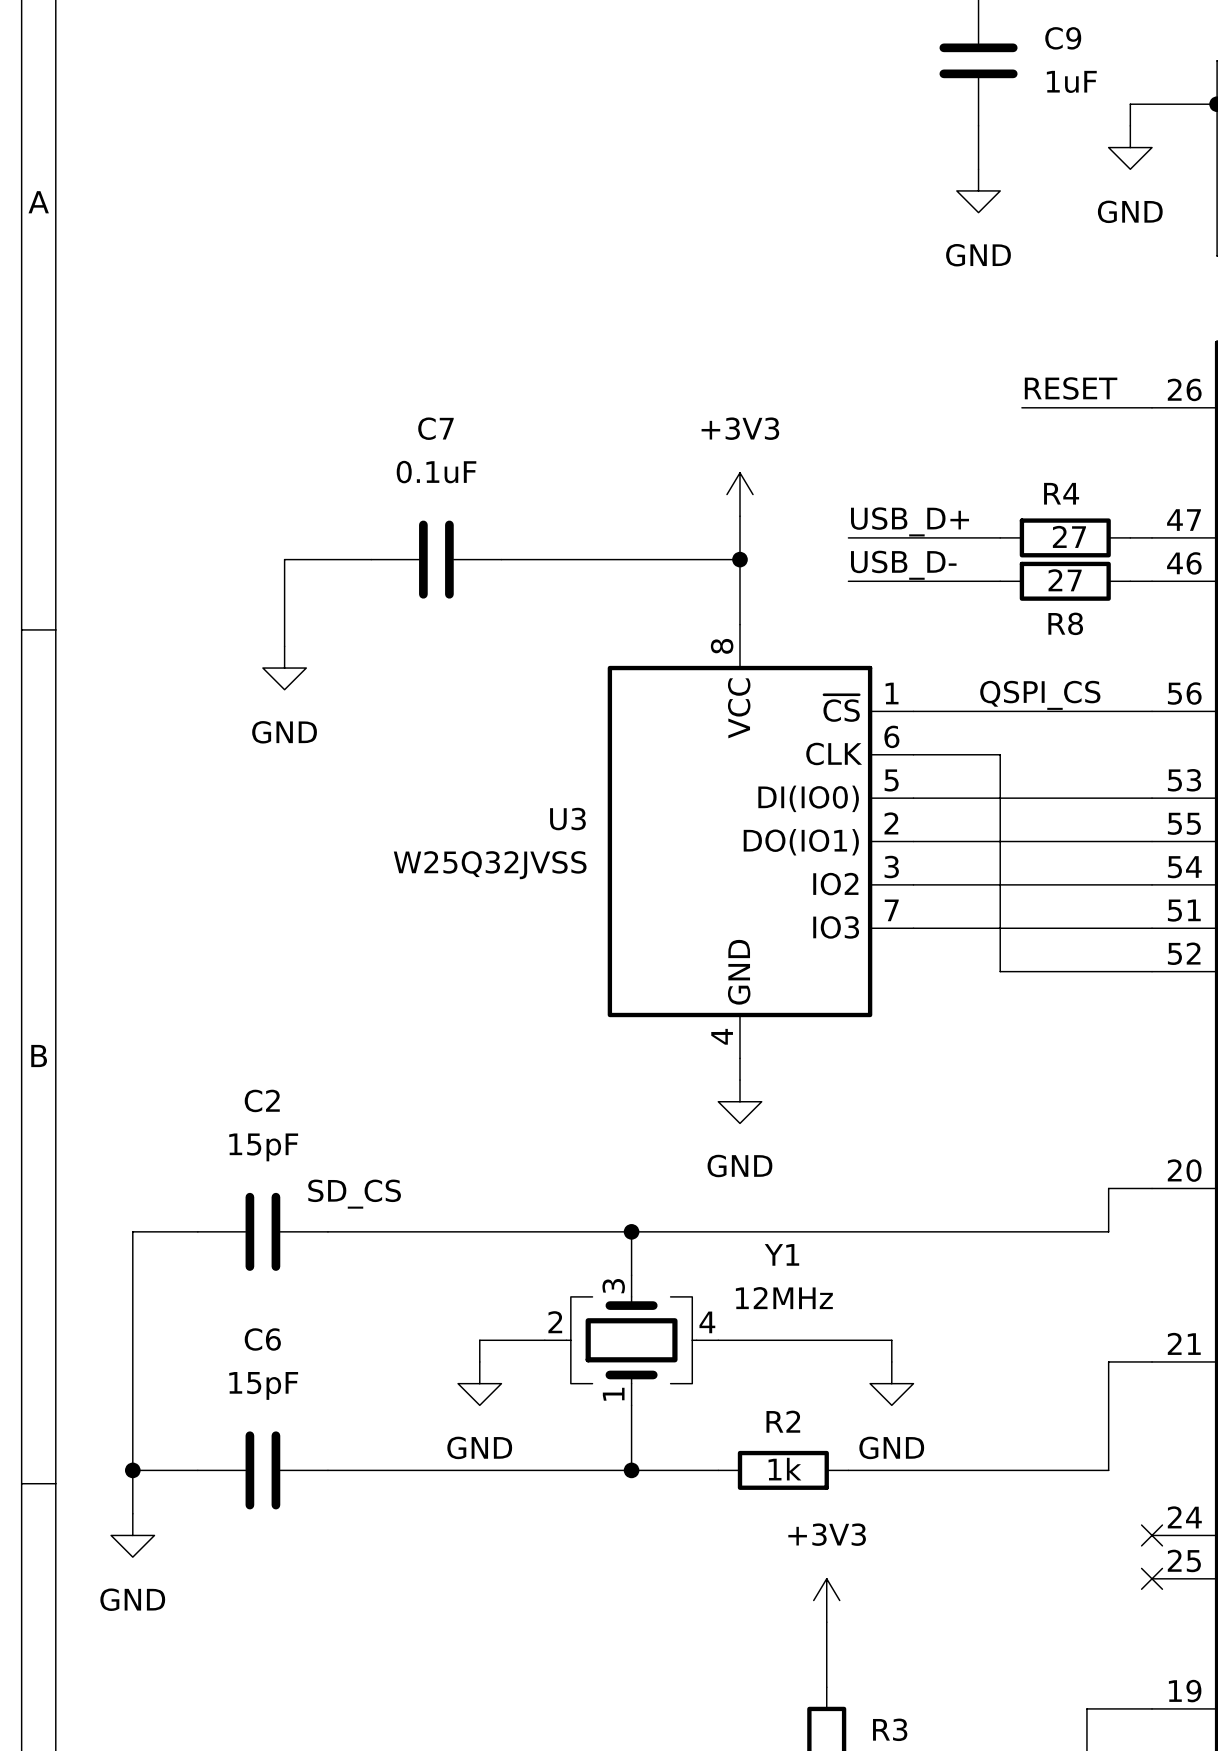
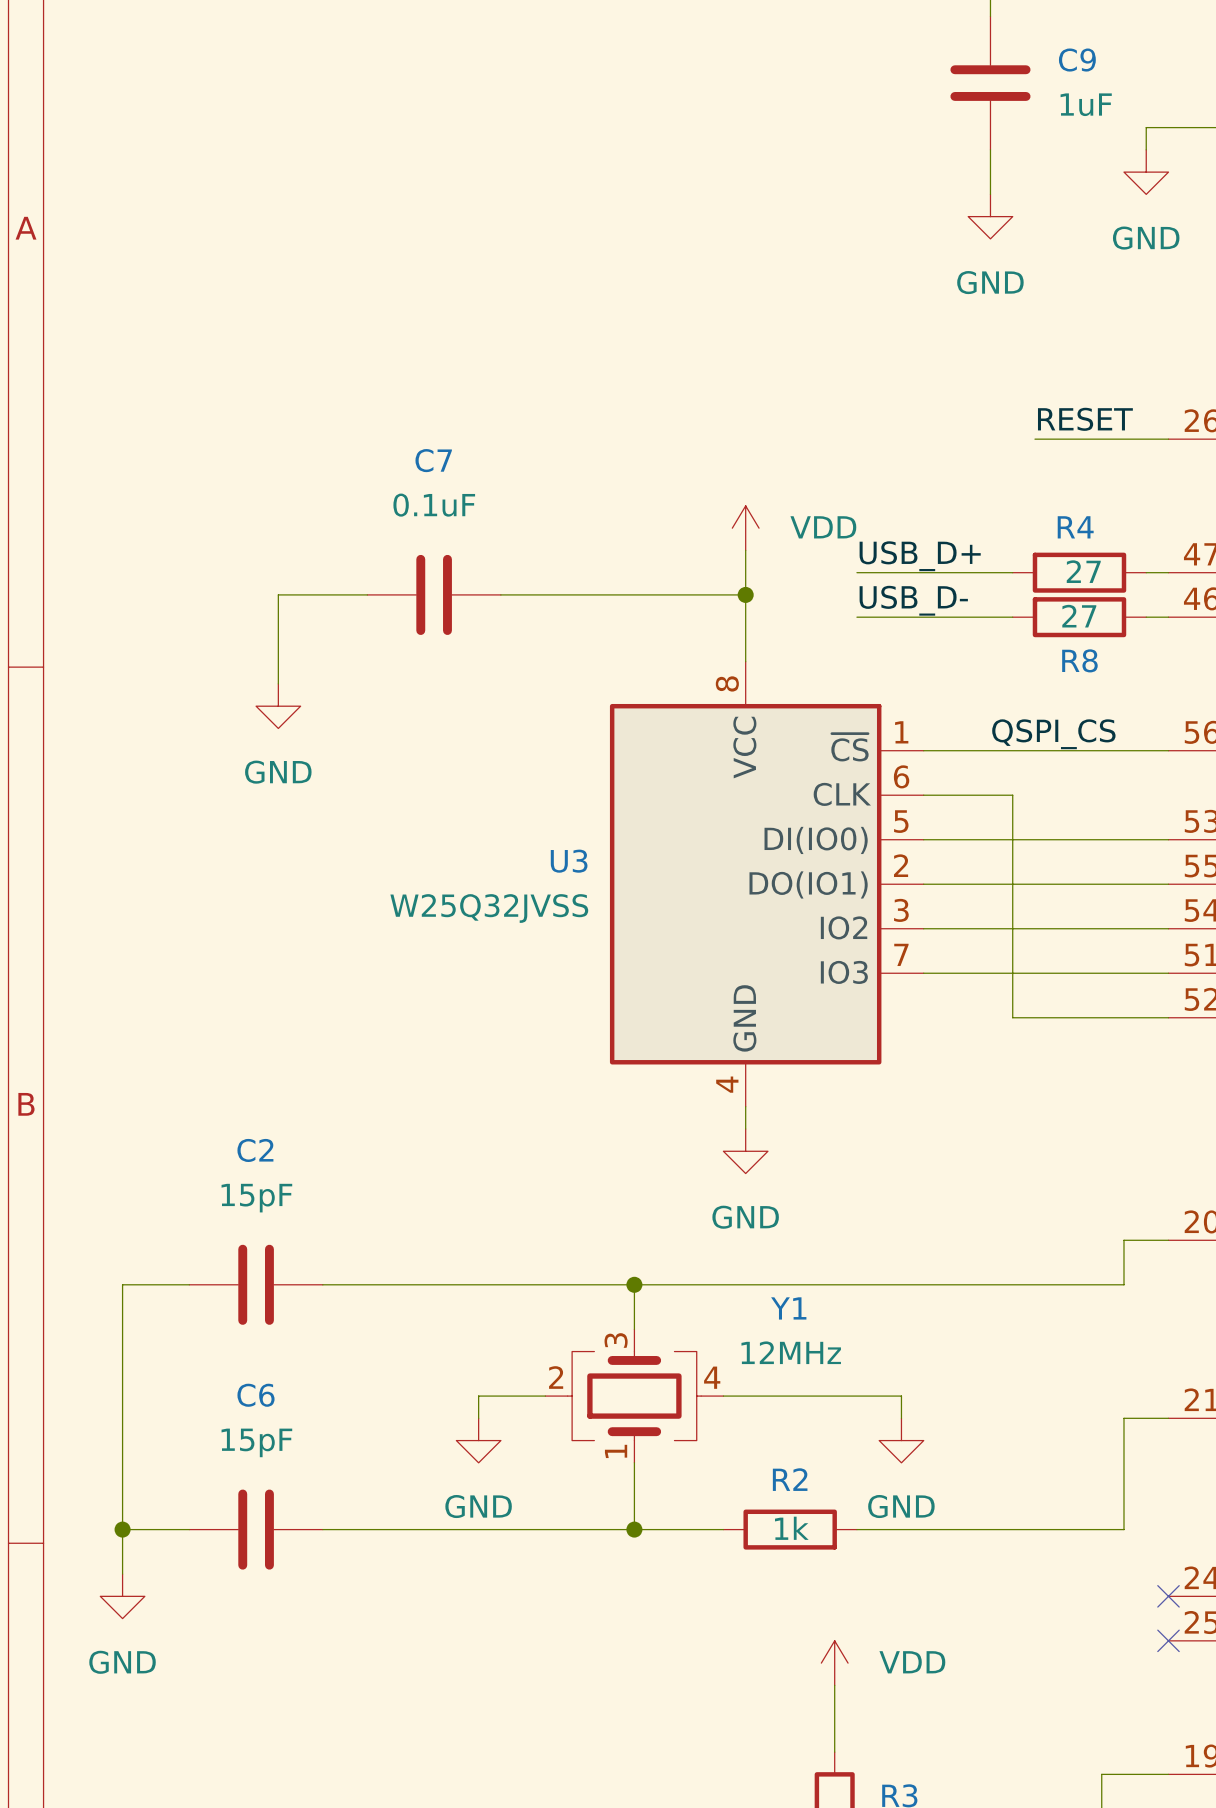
power symbol: +3V3 (739, 494) -> VDD (745, 528)
label: SD_CS (354, 1194) -> none
power symbol: +3V3 (826, 1600) -> VDD (834, 1663)

